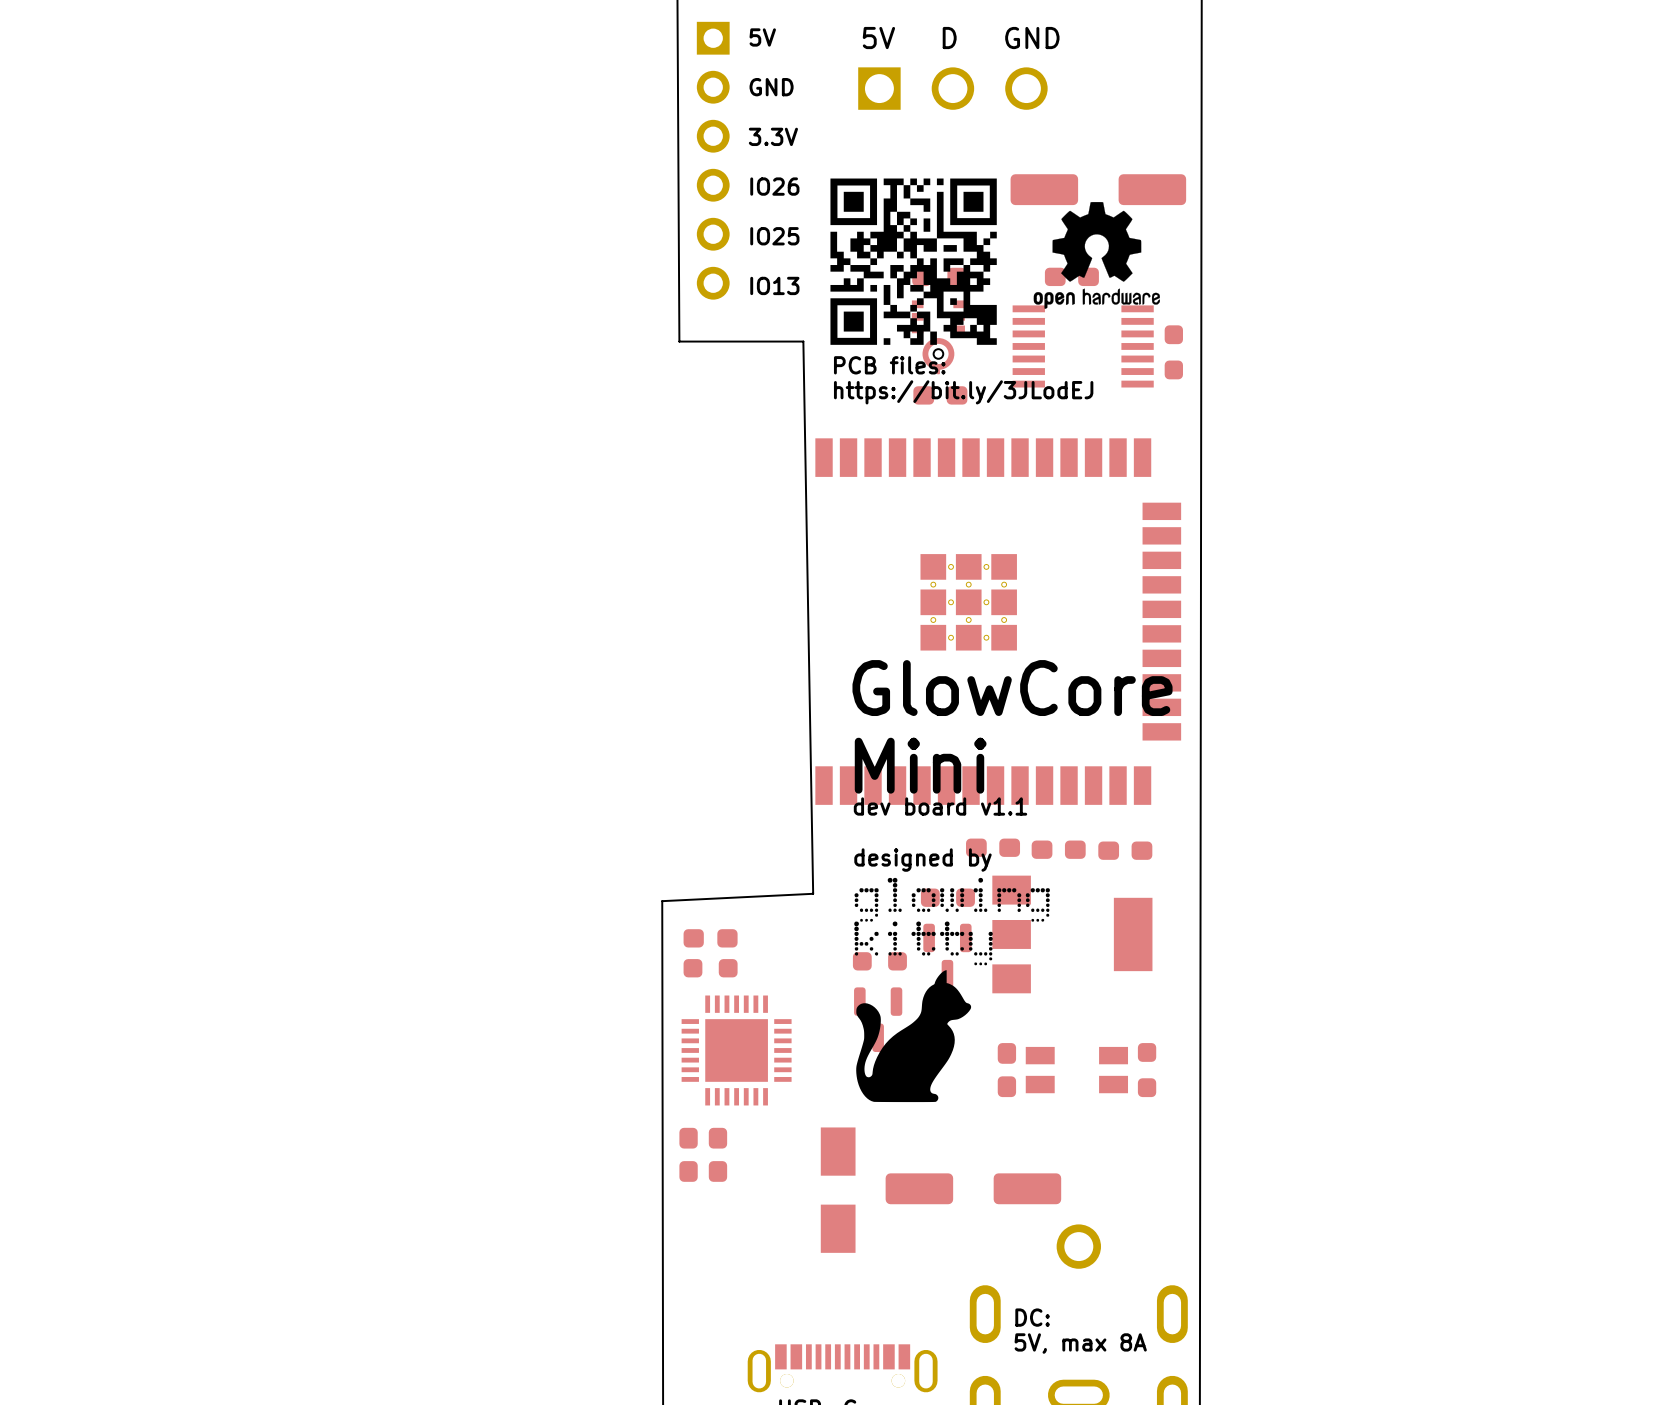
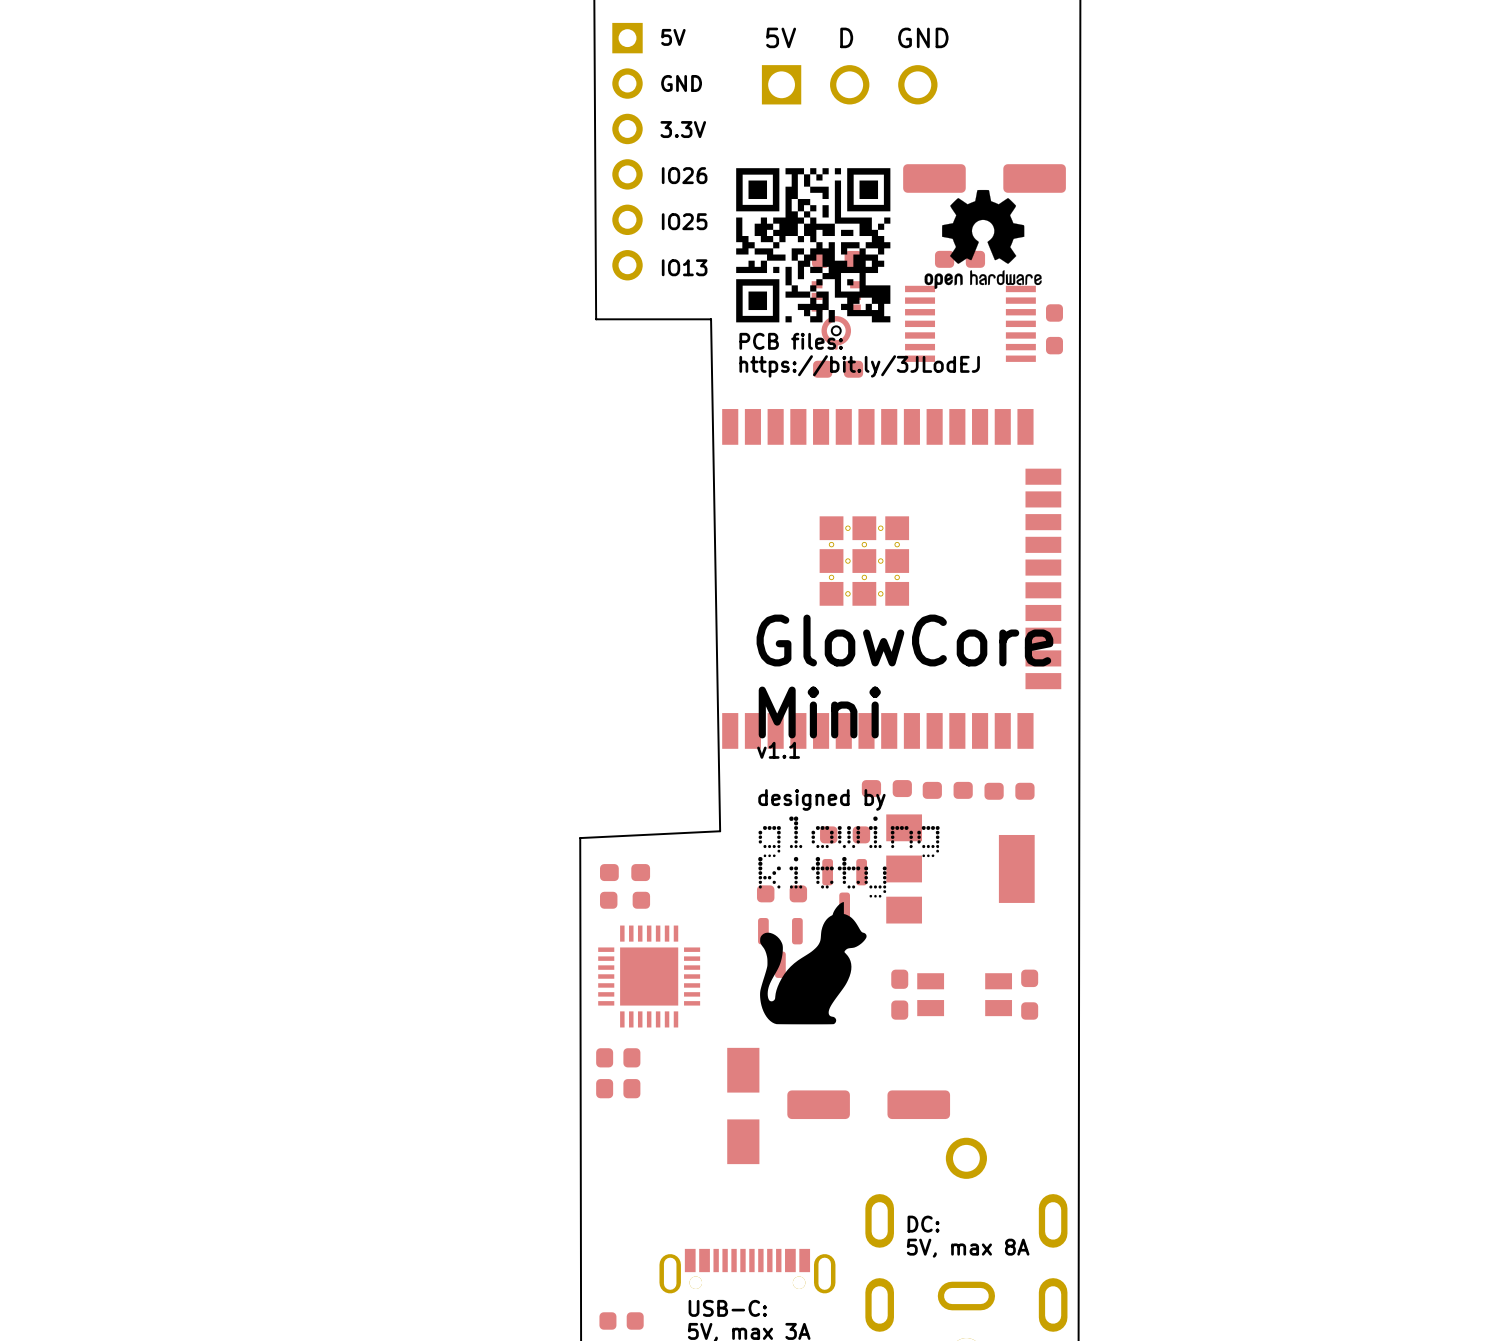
text: dev board v1.1 (940, 806) -> v1.1 (778, 750)

